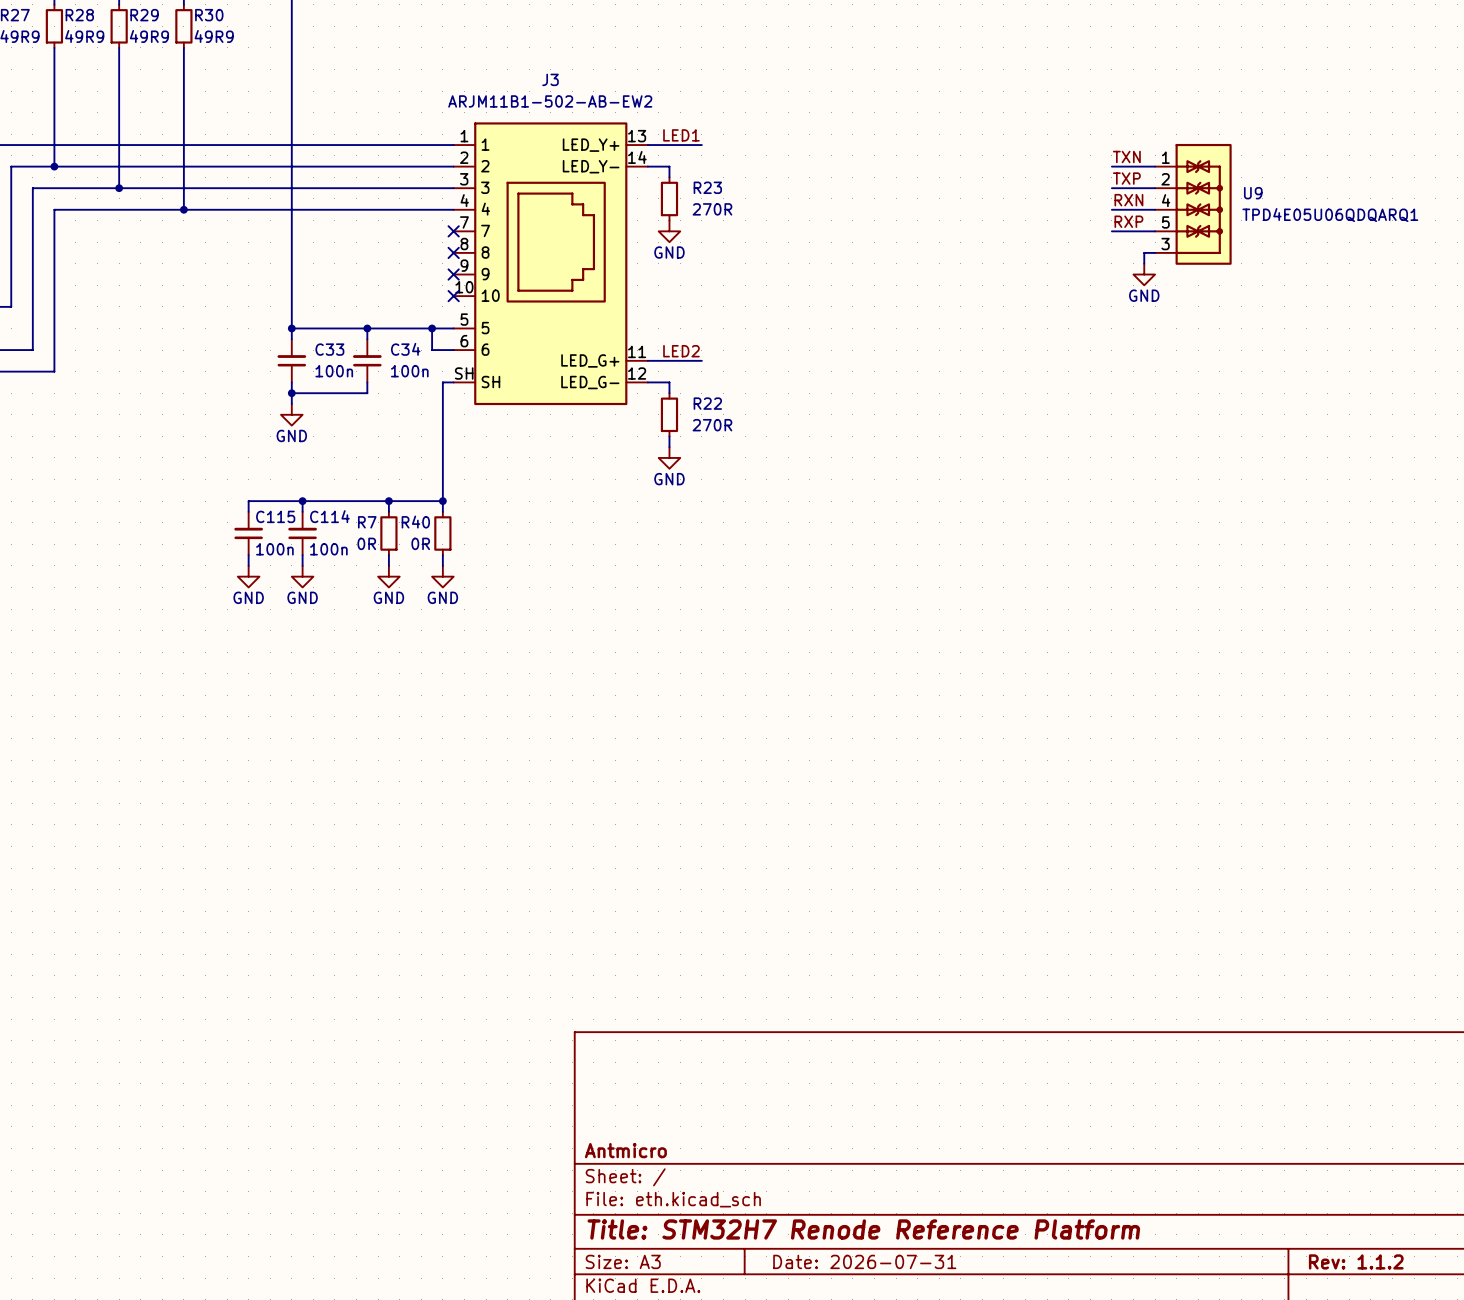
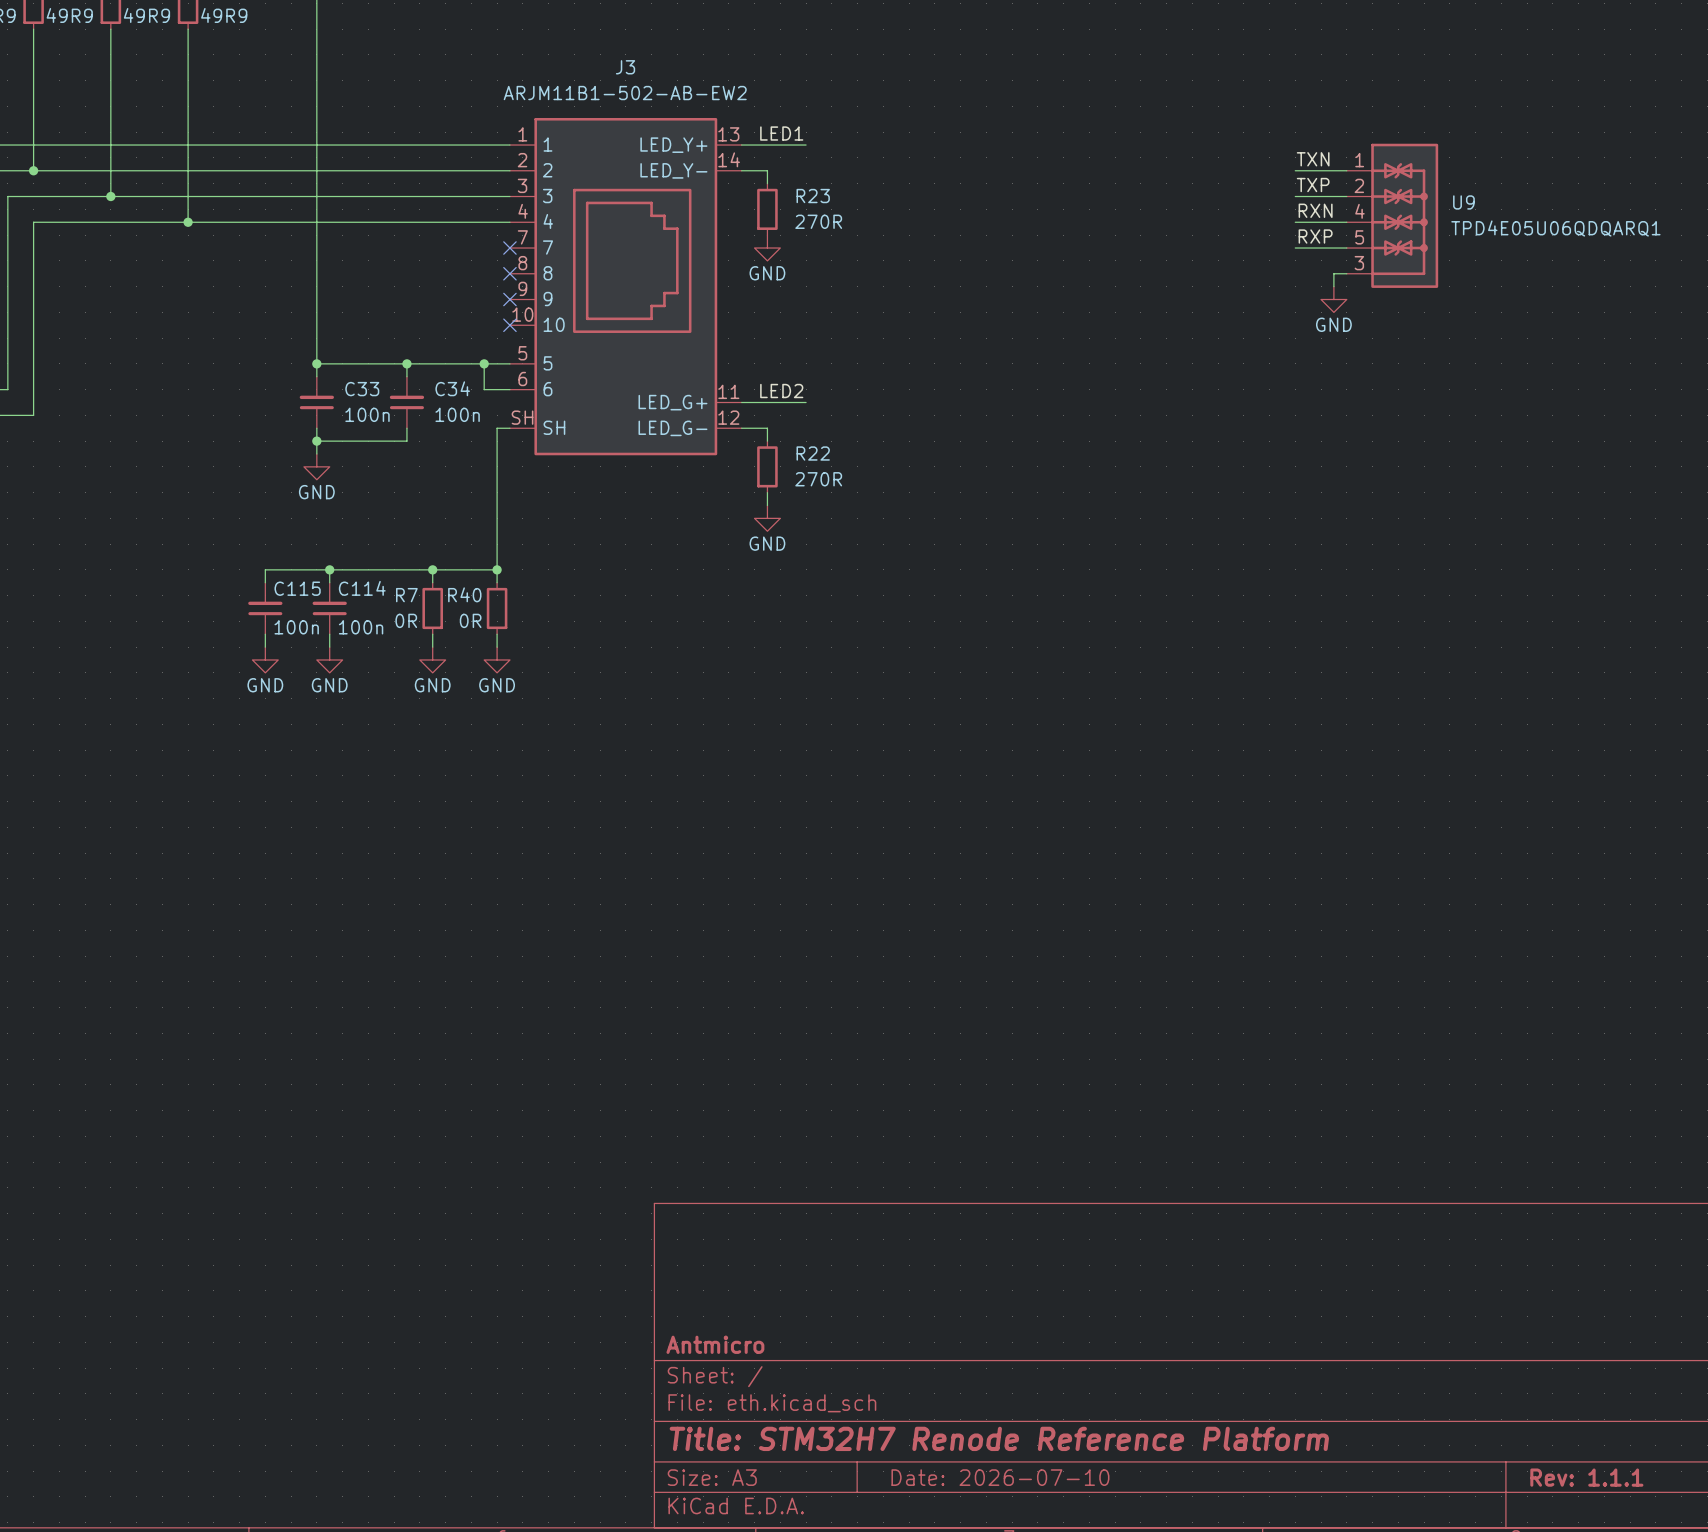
title block: Date: 2026-07-31 (864, 1261) -> Date: 2026-07-10 (1000, 1477)
title block: Rev: 1.1.2 (1356, 1261) -> Rev: 1.1.1 (1586, 1477)

